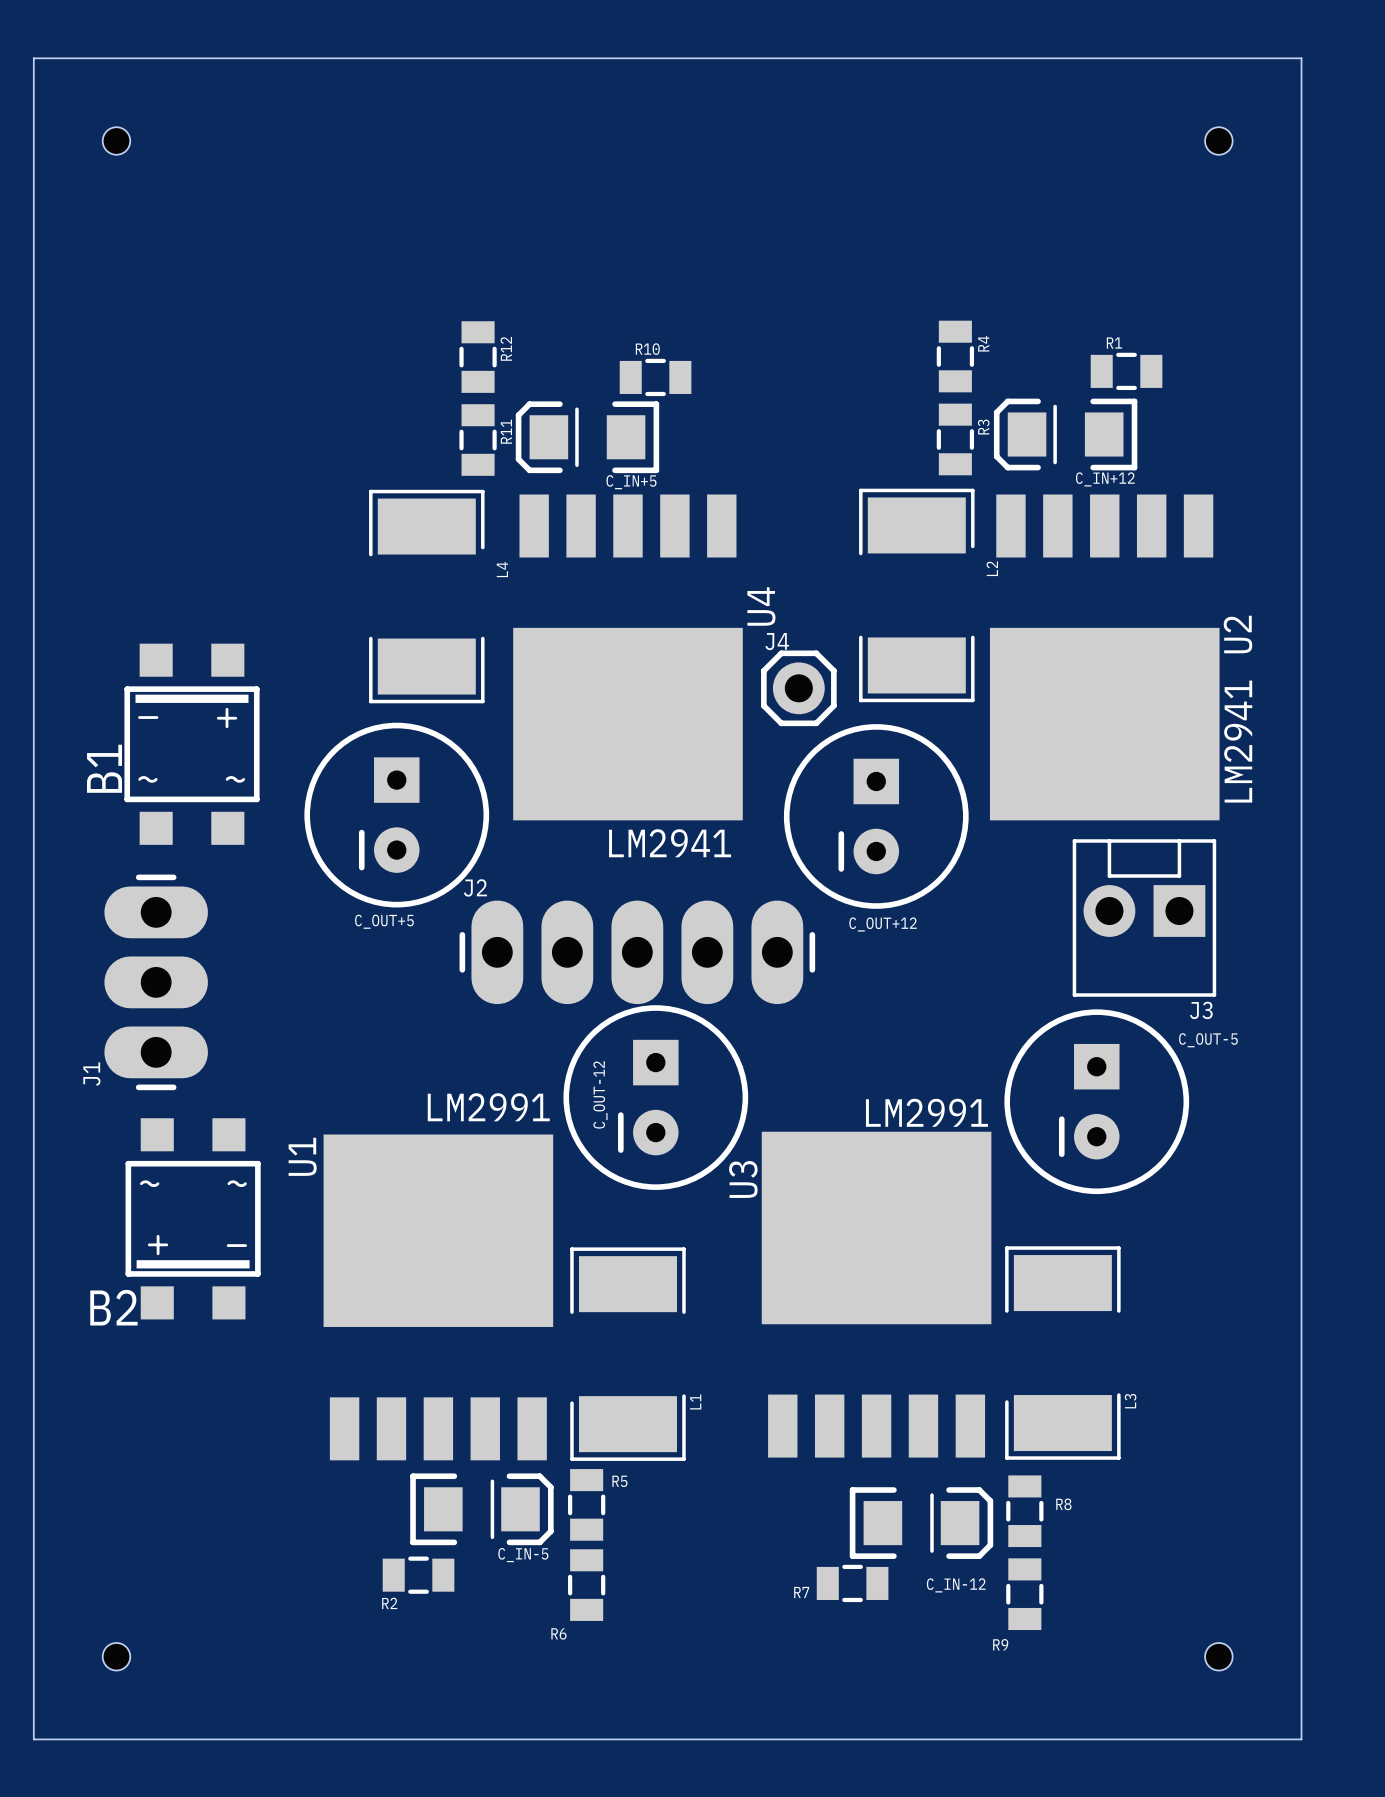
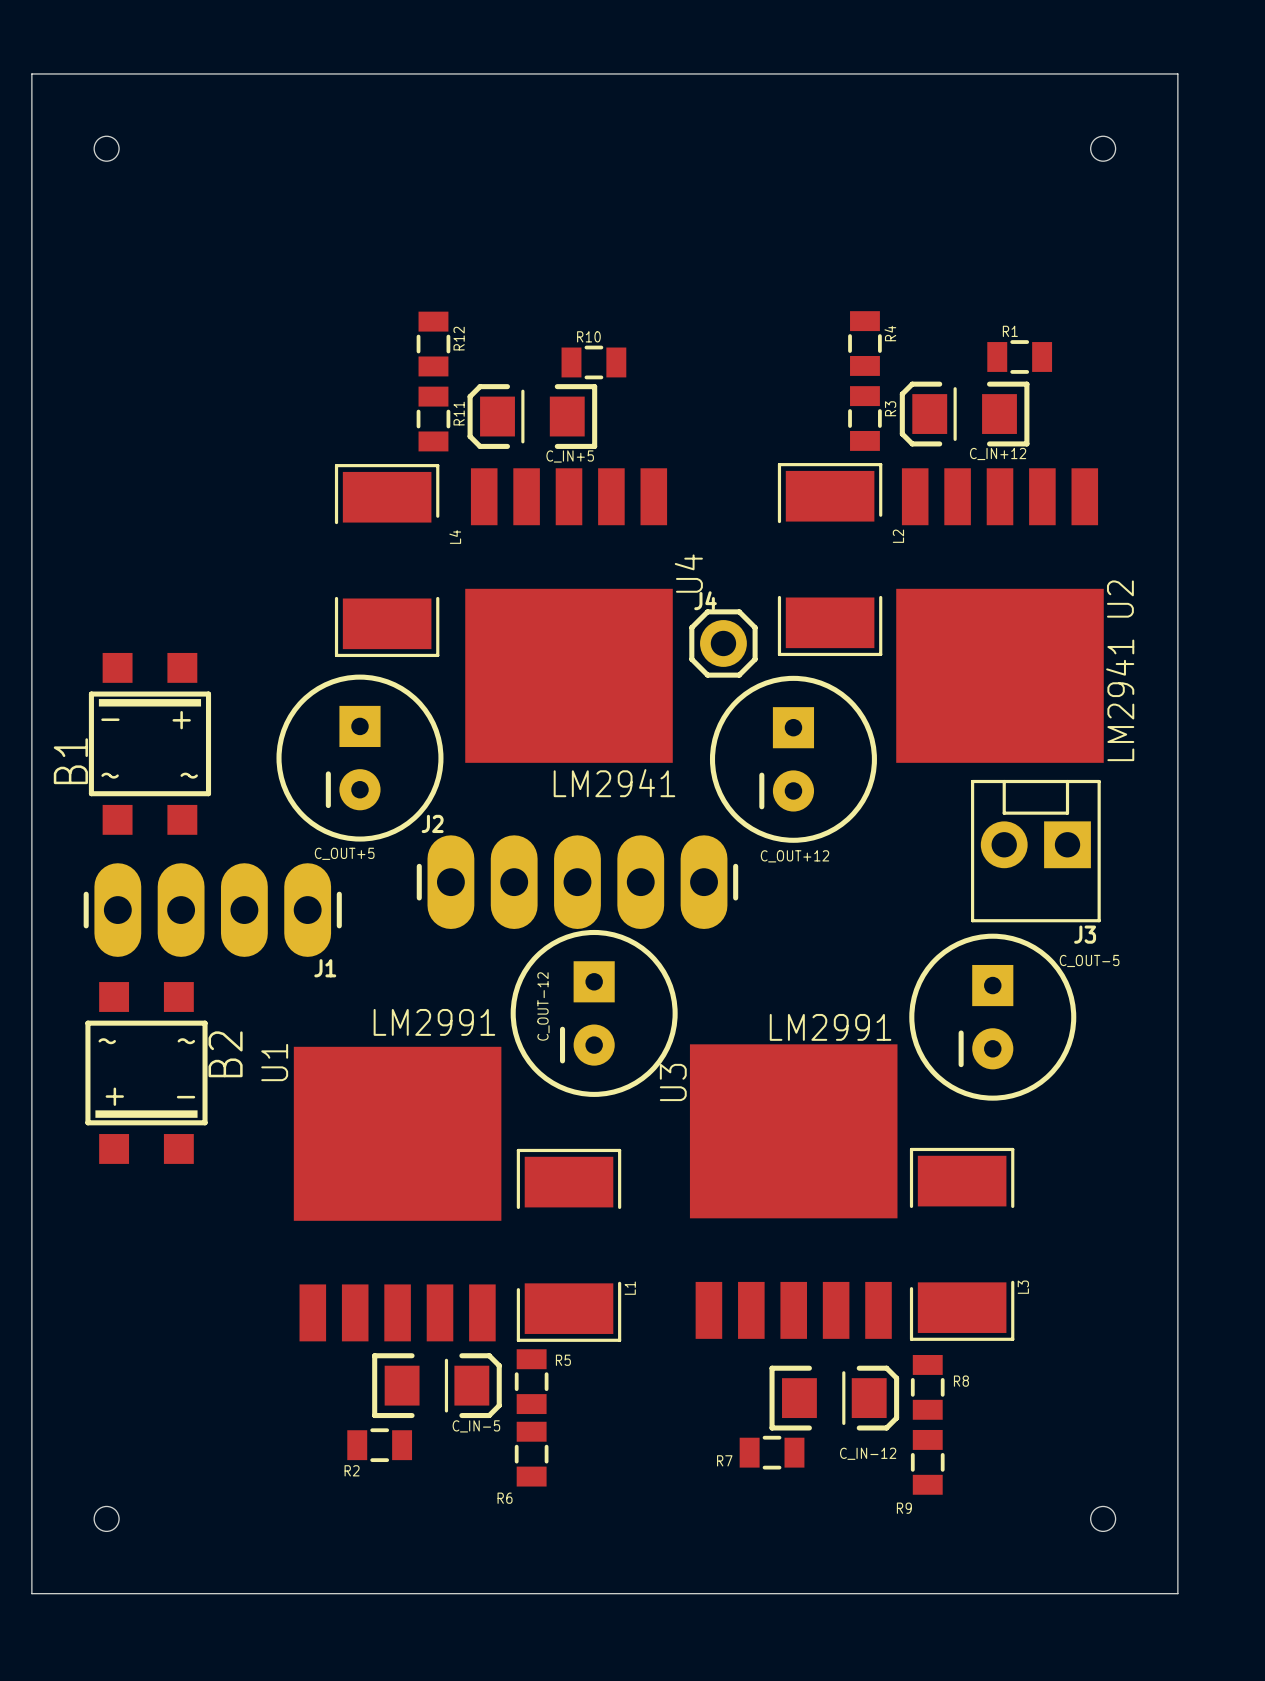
B1 position: (192, 744) -> (149, 743)
J1 footprint: [104, 874, 208, 1091] -> [83, 863, 342, 957]
J1 name position: J1 (91, 1074) -> J1 (325, 968)
B2 position: (193, 1218) -> (146, 1072)
B2 name rotation: 0° (113, 1307) -> 90° counterclockwise (225, 1054)
B2 name position: B2 (113, 1307) -> B2 (225, 1054)

